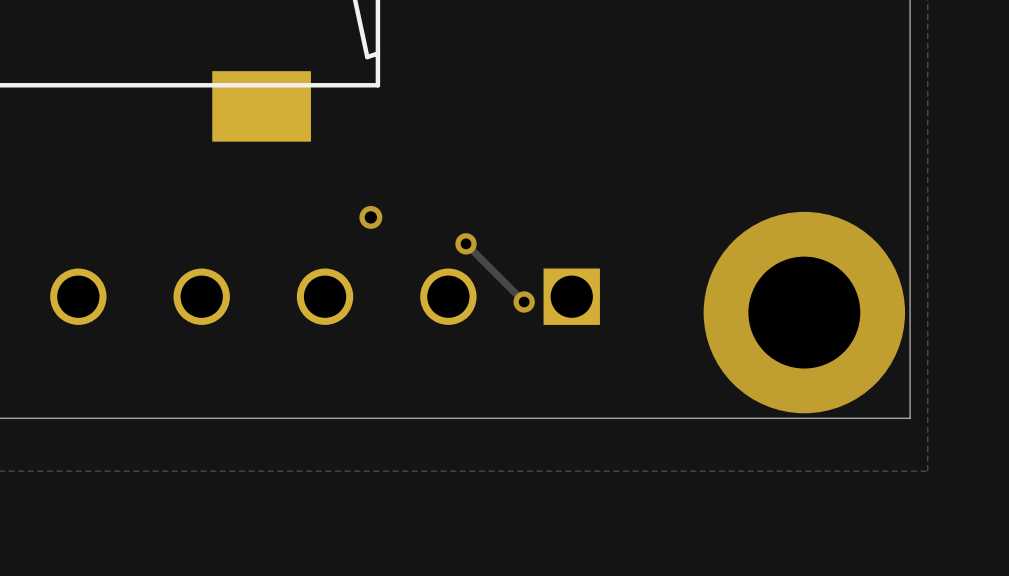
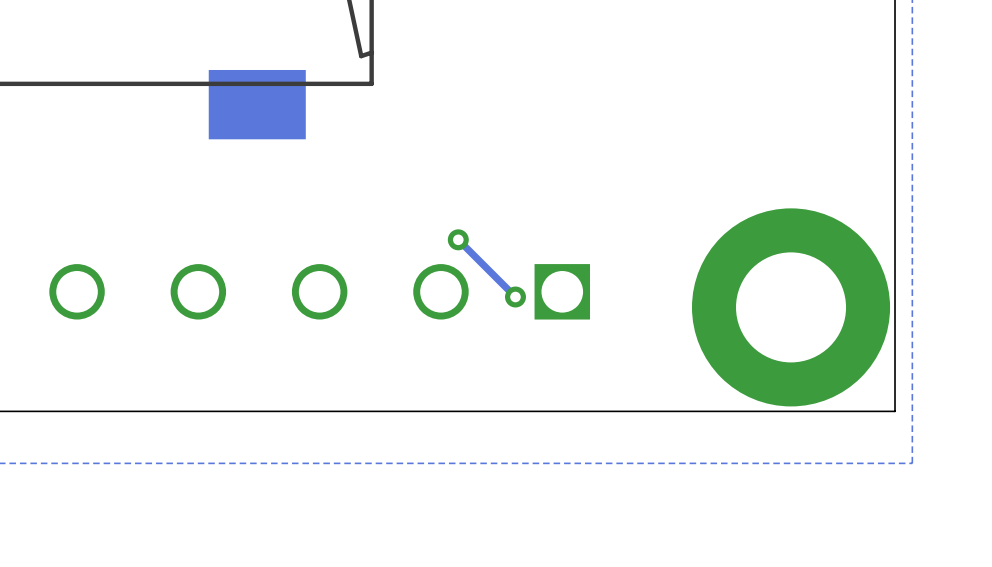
via: (370, 217) -> none

